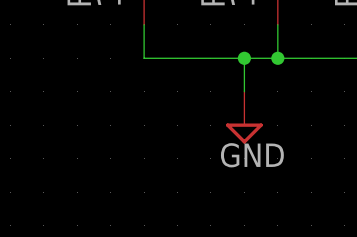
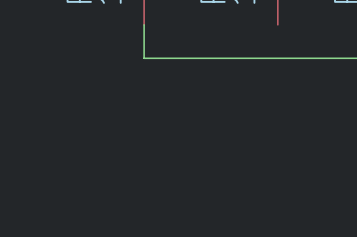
wire: (277, 24) (277, 58) -> none
wire: (244, 58) (244, 91) -> none
junction: (244, 58) -> none
junction: (277, 58) -> none
power symbol: GND (244, 117) -> none

